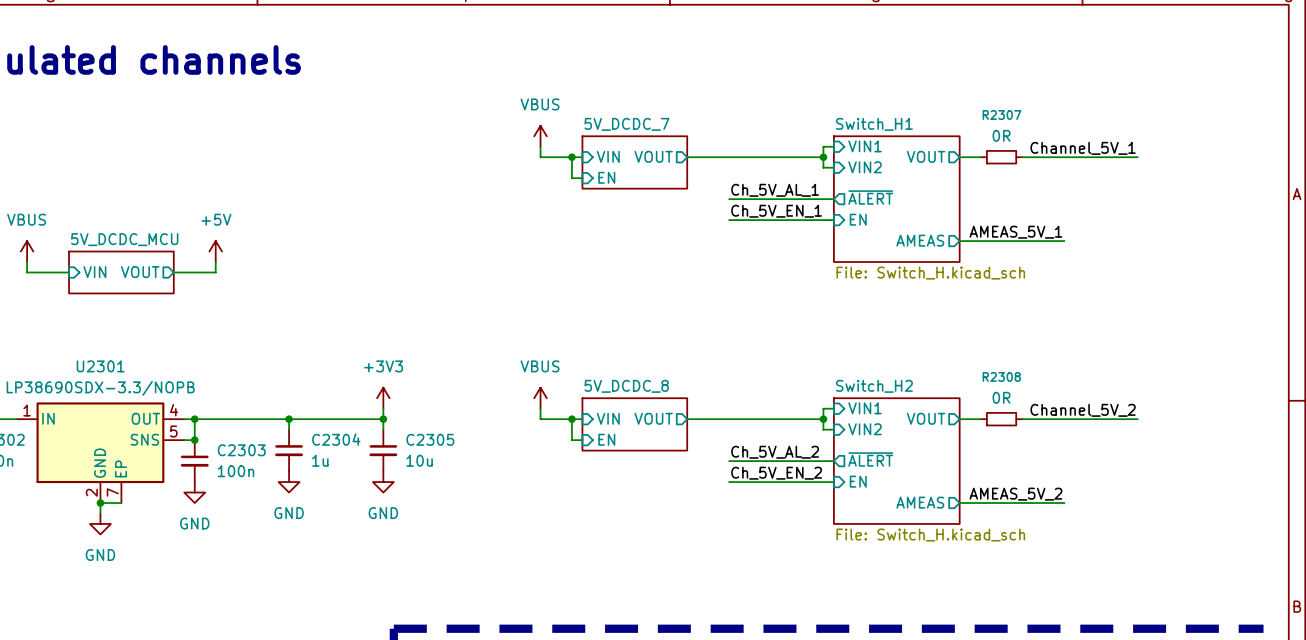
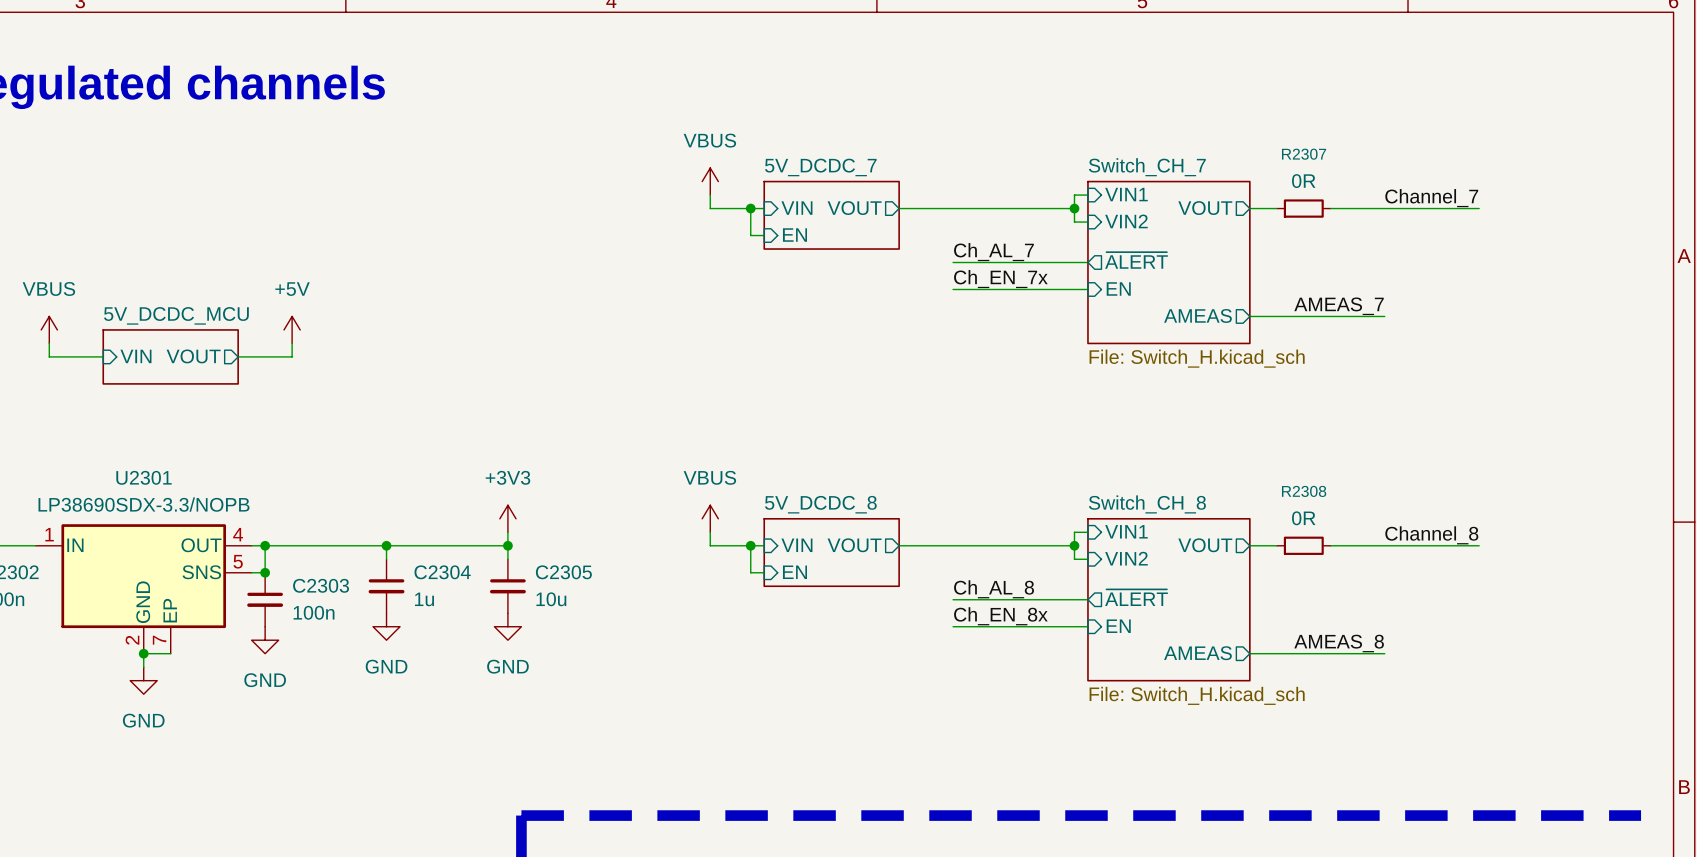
sheet Switch_H1 name: Switch_H1 (874, 124) -> Switch_CH_7 (1147, 167)
label: Channel_5V_1 (1083, 148) -> Channel_7 (1431, 198)
label: Ch_5V_AL_1 (775, 190) -> Ch_AL_7 (993, 252)
label: Ch_5V_EN_1 (776, 211) -> Ch_EN_7x (1000, 279)
label: AMEAS_5V_1 (1015, 232) -> AMEAS_7 (1339, 306)
sheet Switch_H2 name: Switch_H2 (874, 386) -> Switch_CH_8 (1147, 504)
label: Channel_5V_2 (1083, 410) -> Channel_8 (1431, 535)
label: Ch_5V_AL_2 (775, 452) -> Ch_AL_8 (994, 589)
label: Ch_5V_EN_2 (776, 473) -> Ch_EN_8x (1000, 616)
label: AMEAS_5V_2 (1015, 494) -> AMEAS_8 (1339, 643)

